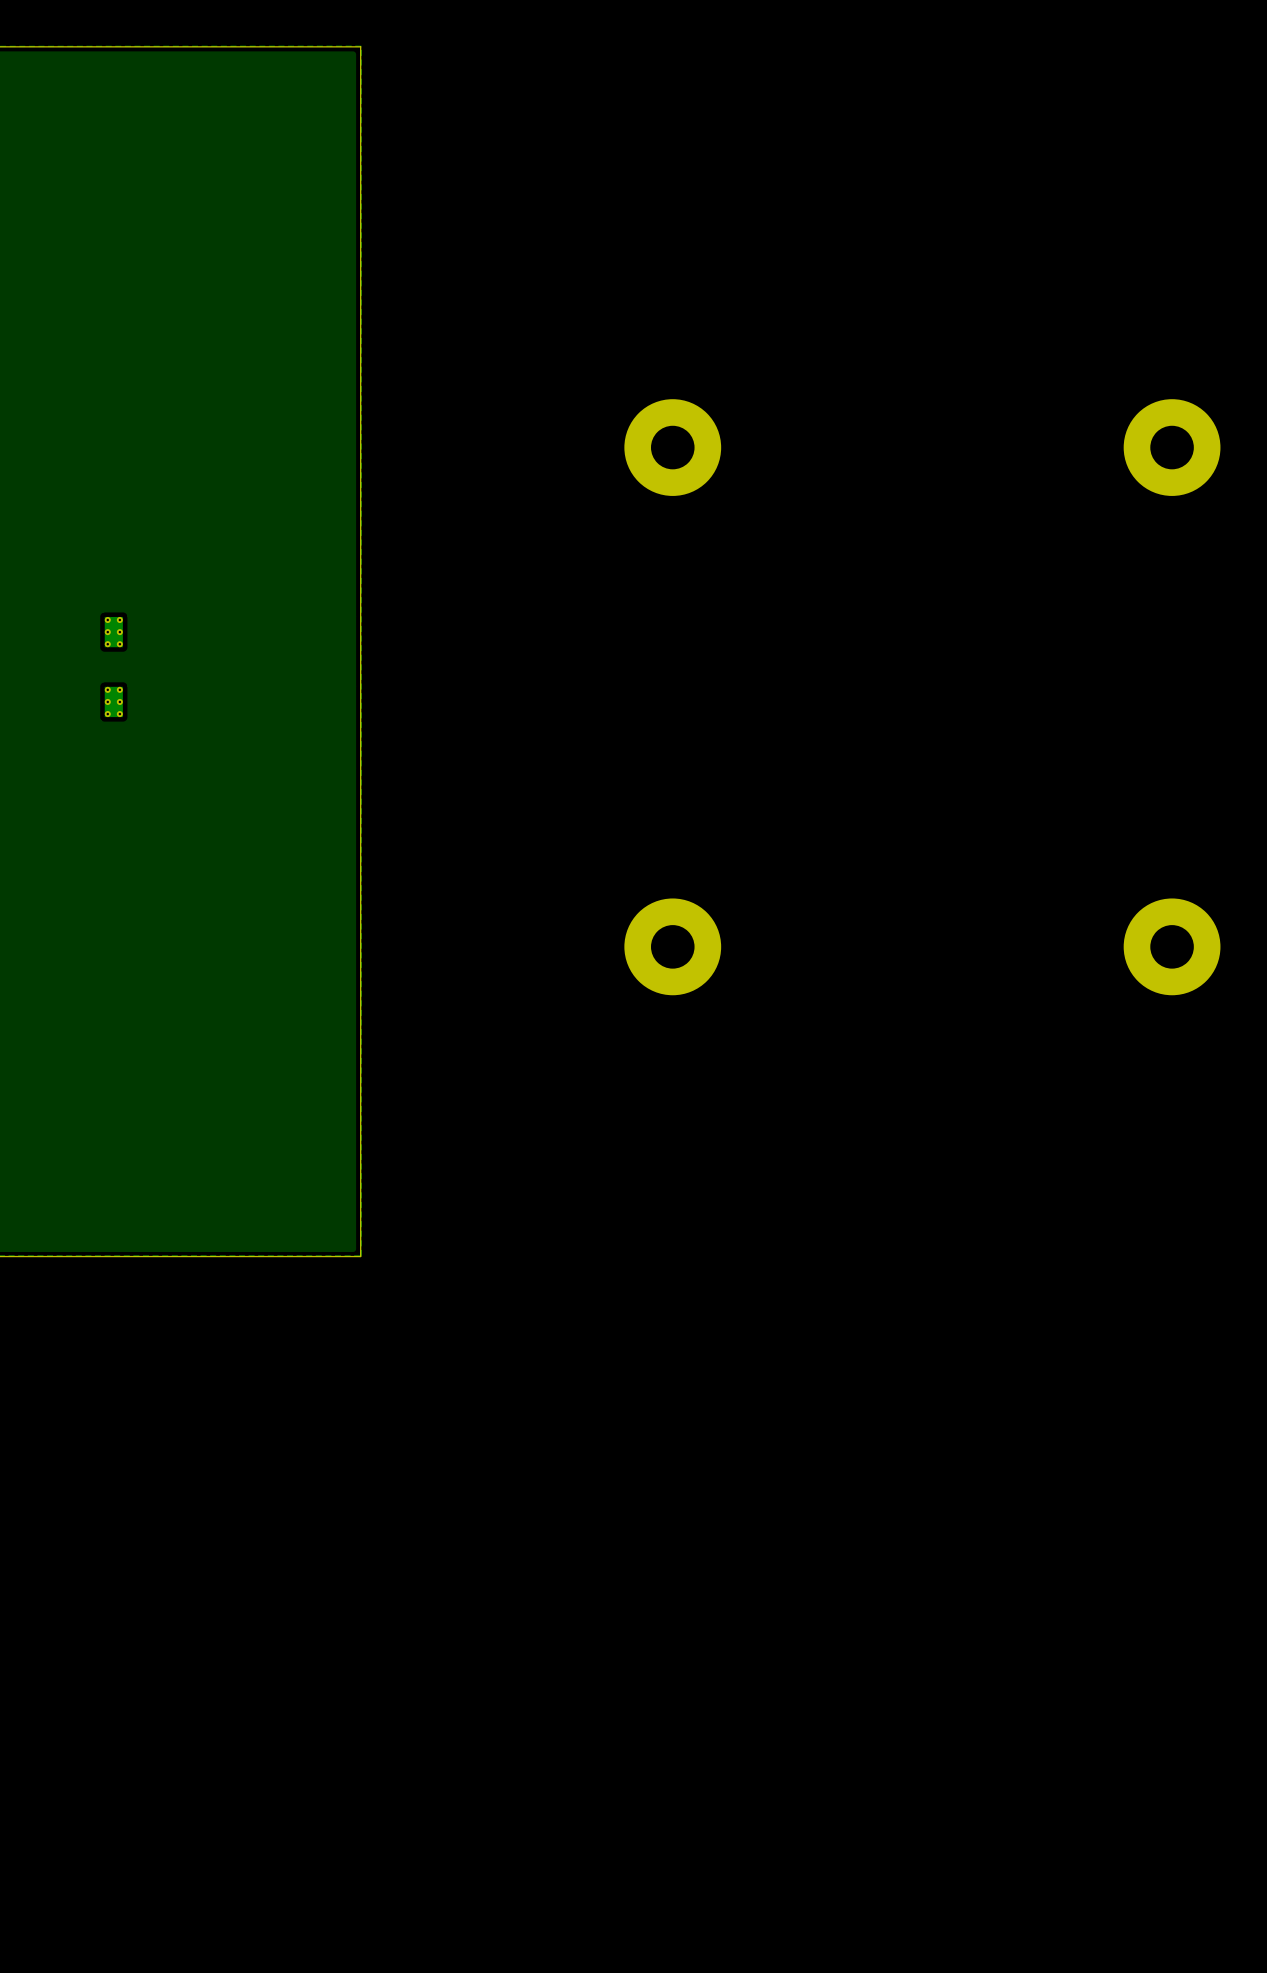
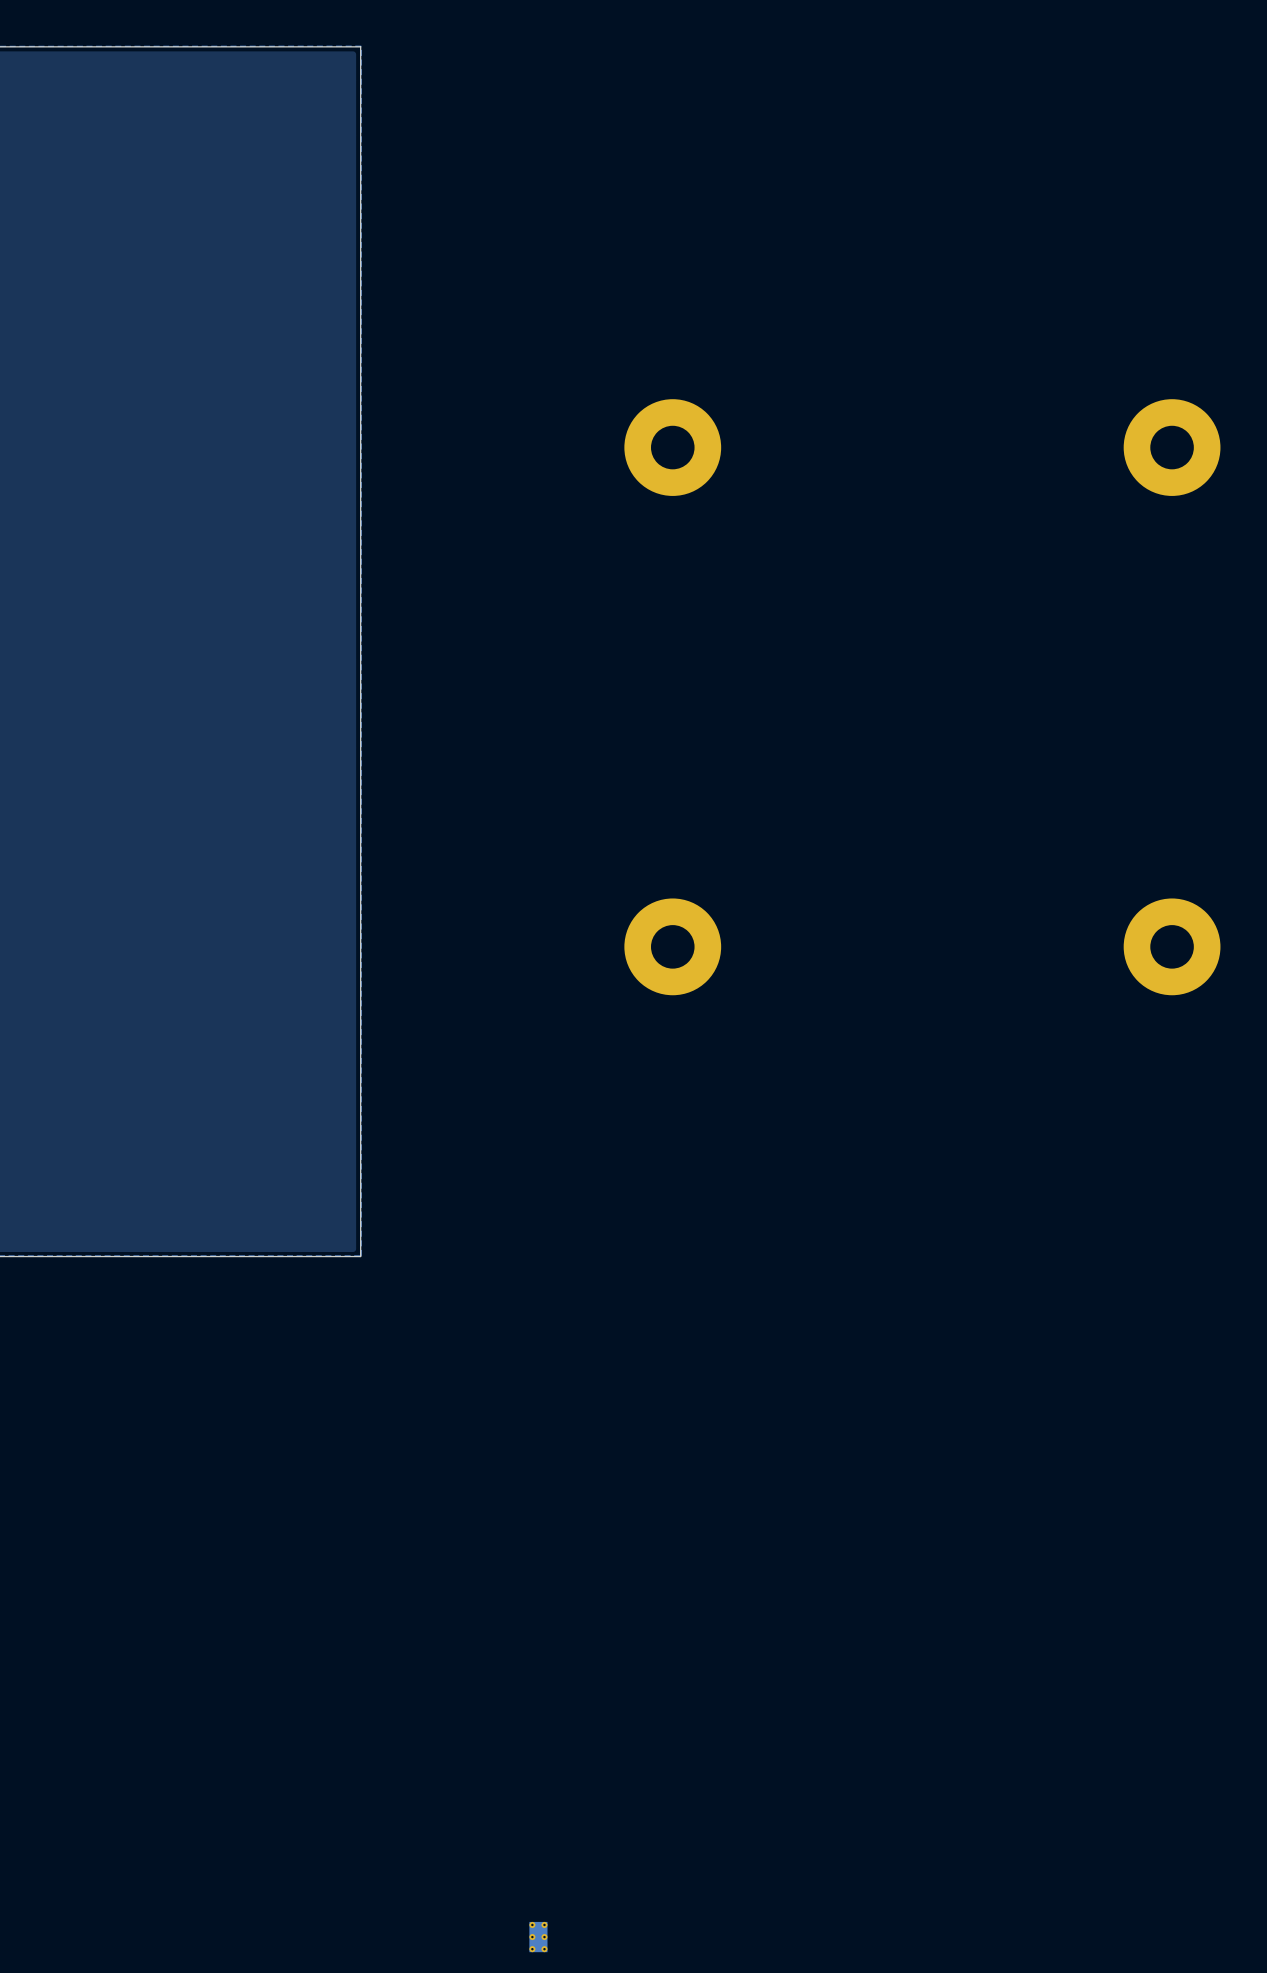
part: (113, 632) -> none
part: (113, 701) -> none
part: none -> (538, 1937)

